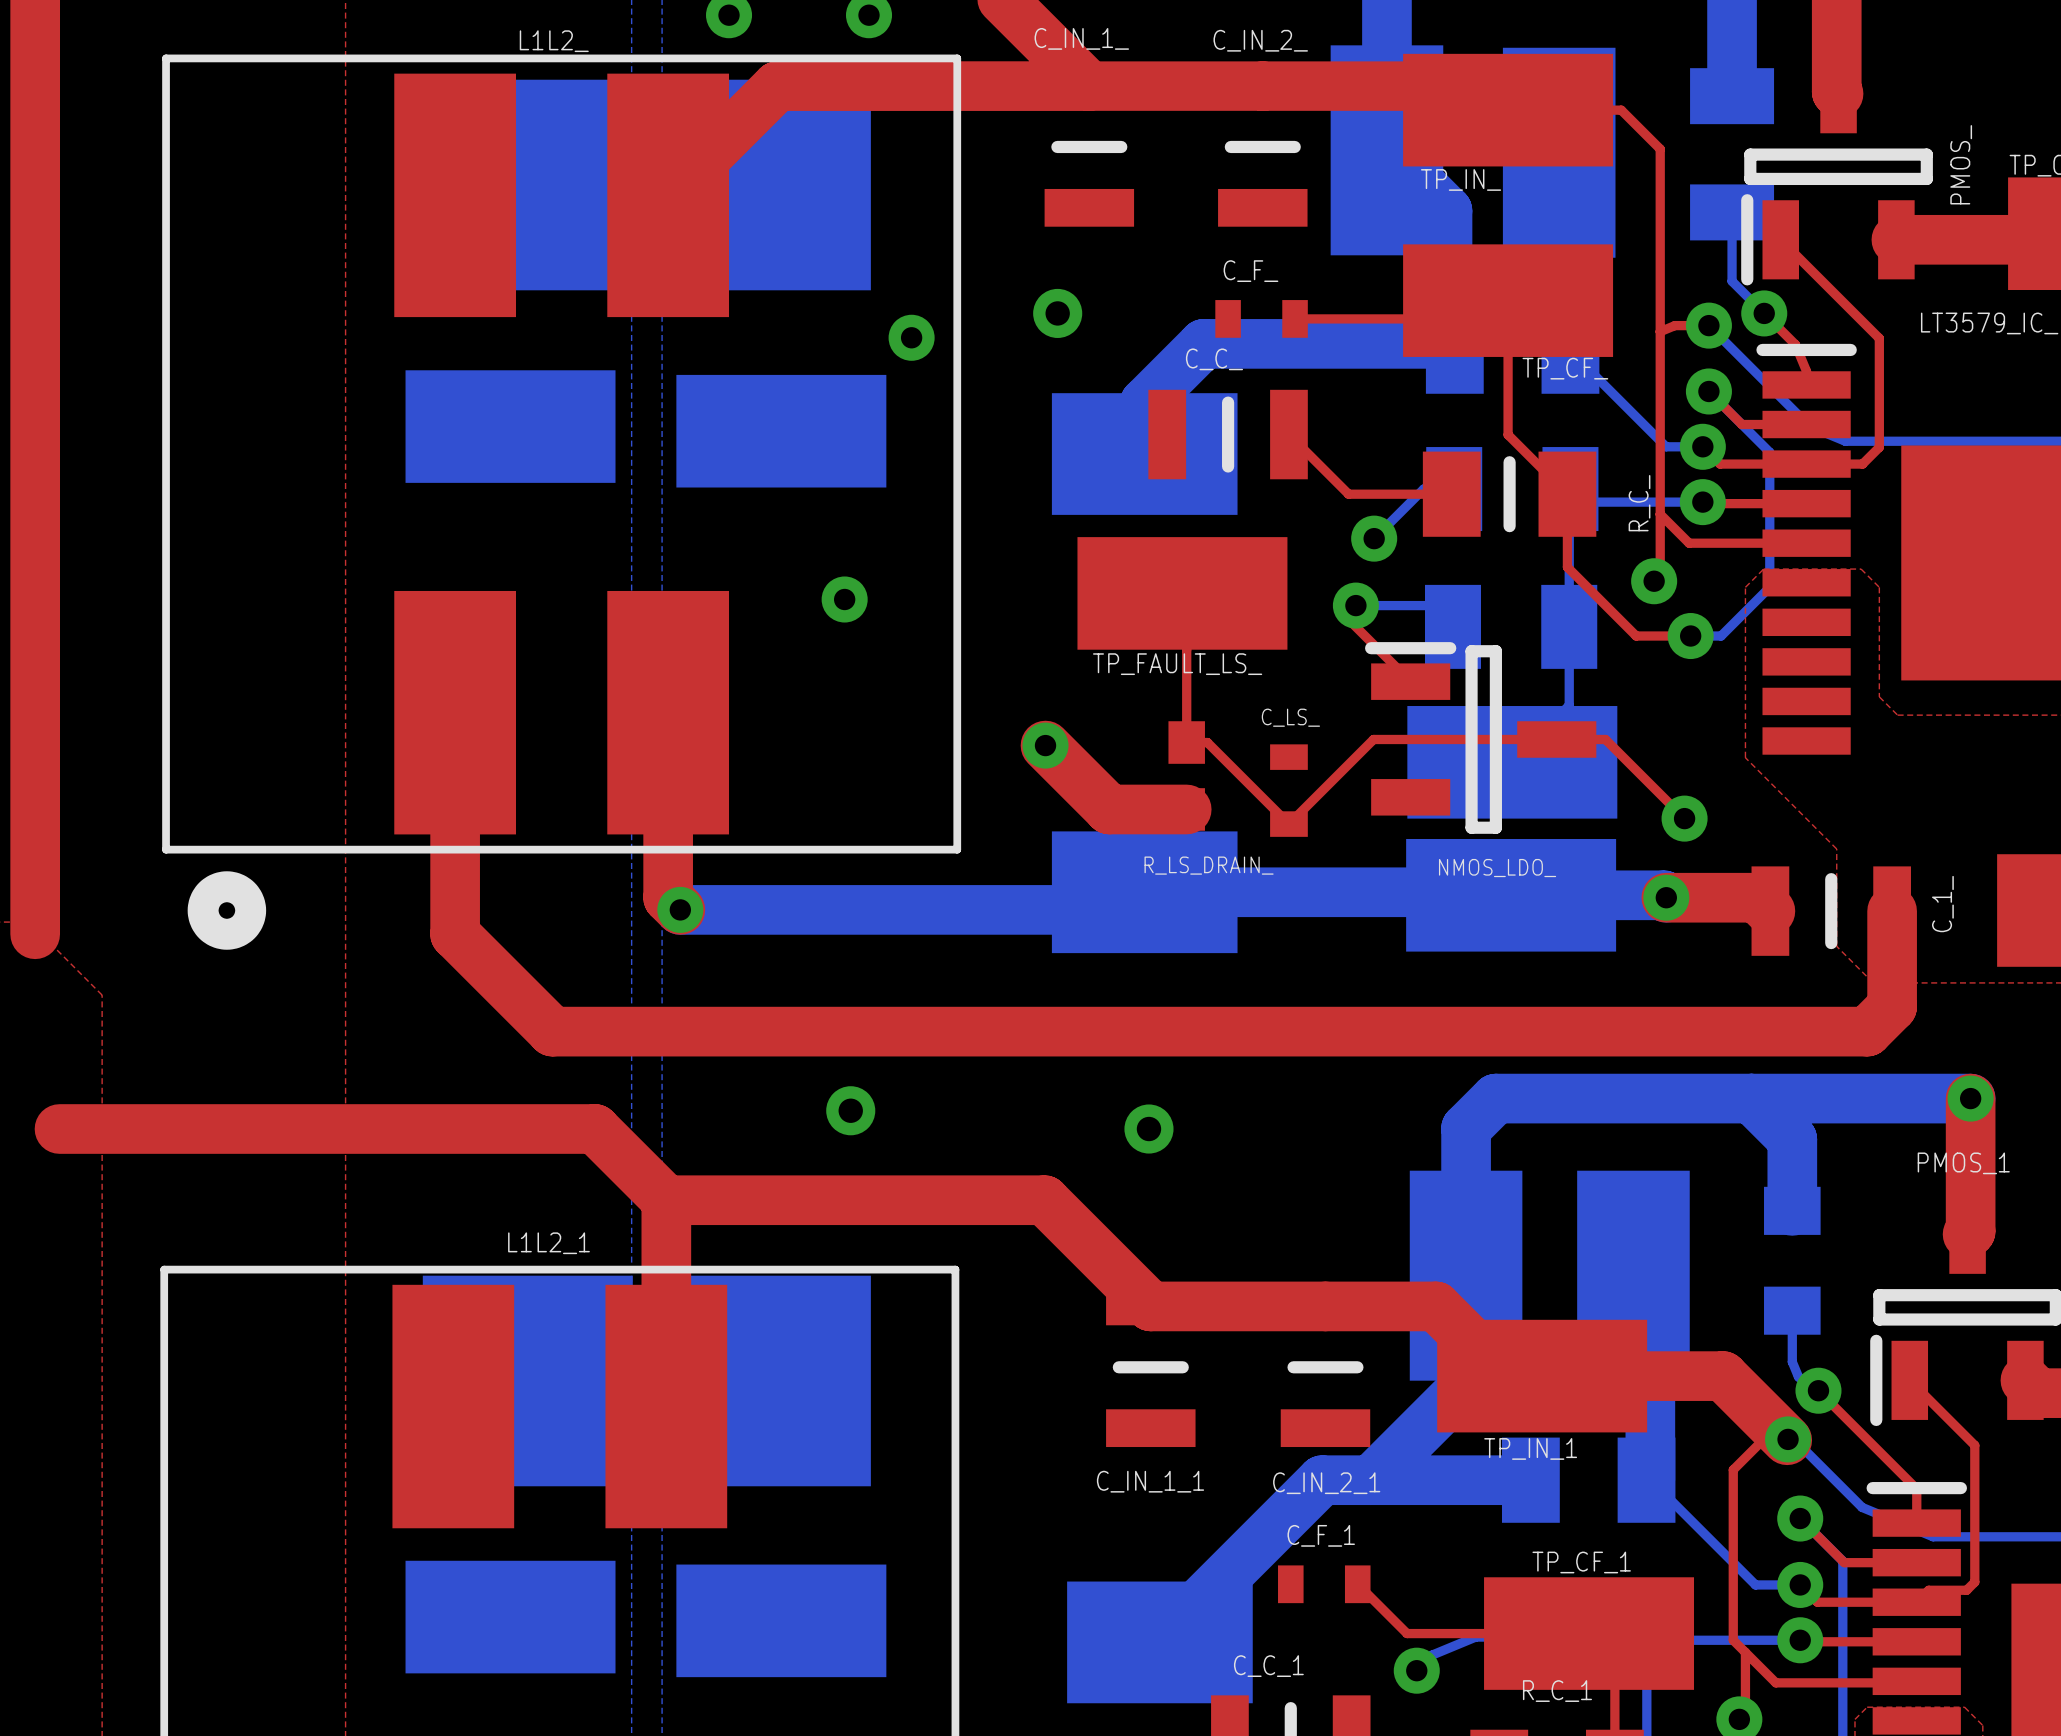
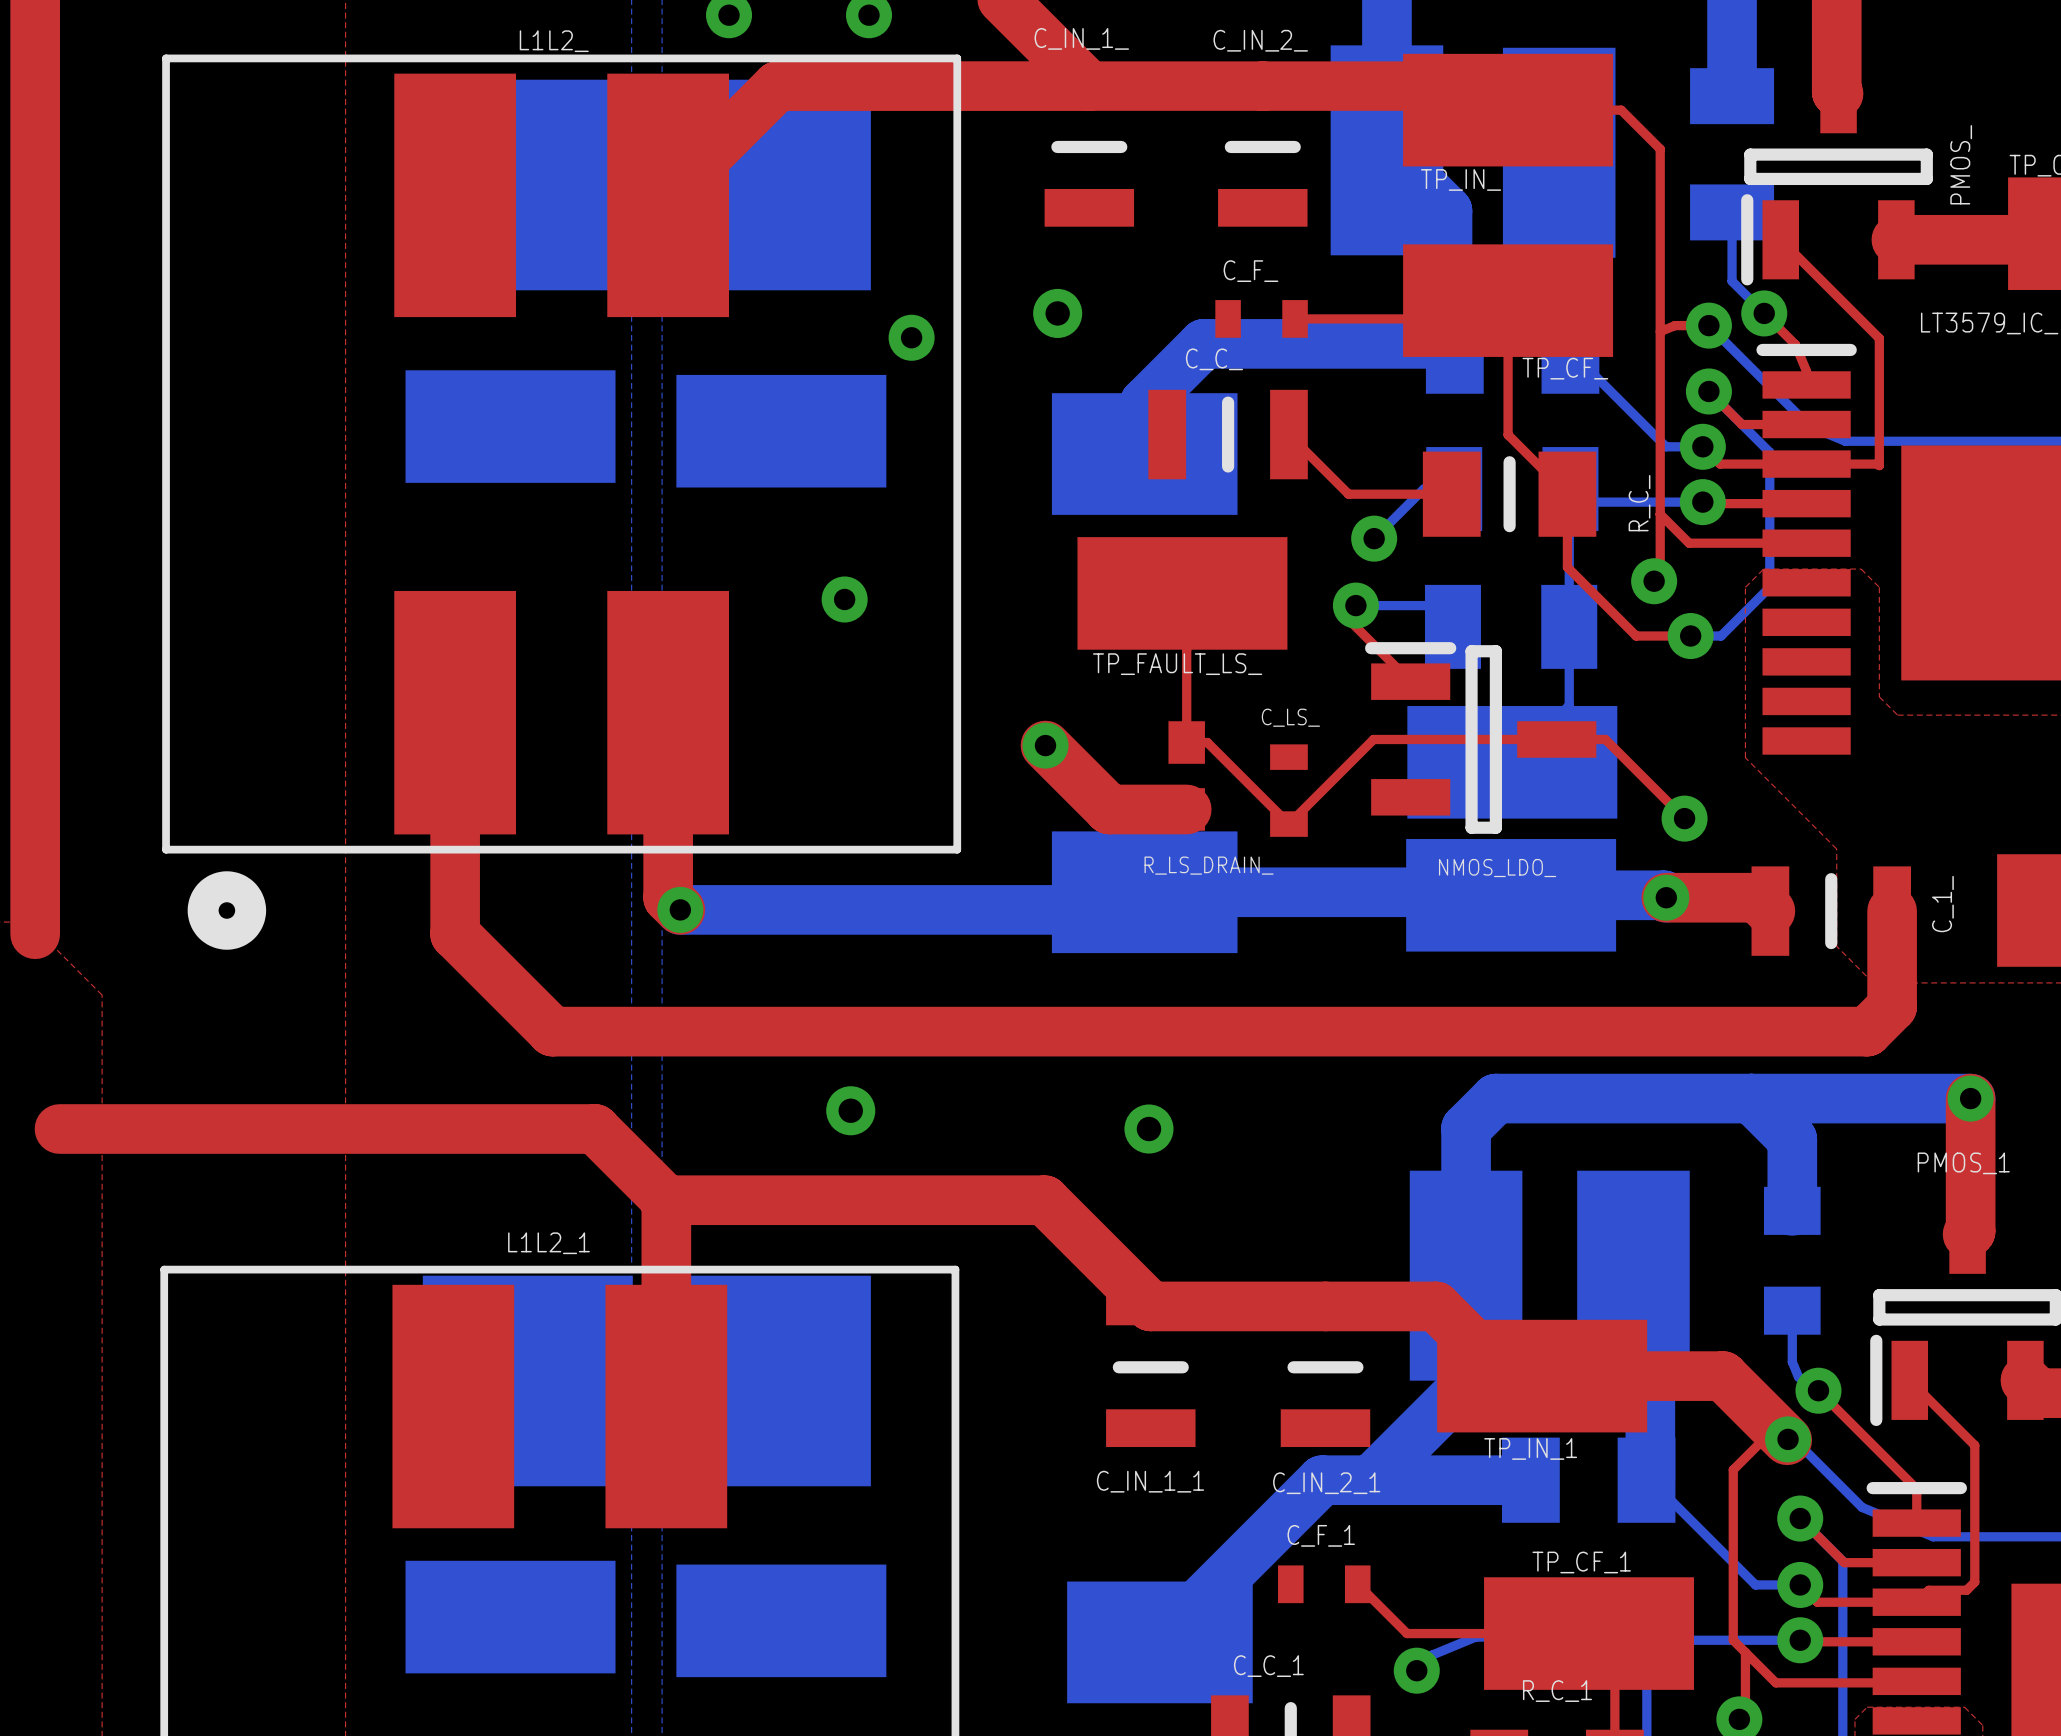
top track: (1879, 447) (1862, 464) -> (1879, 447) (1879, 465) (1862, 464)

